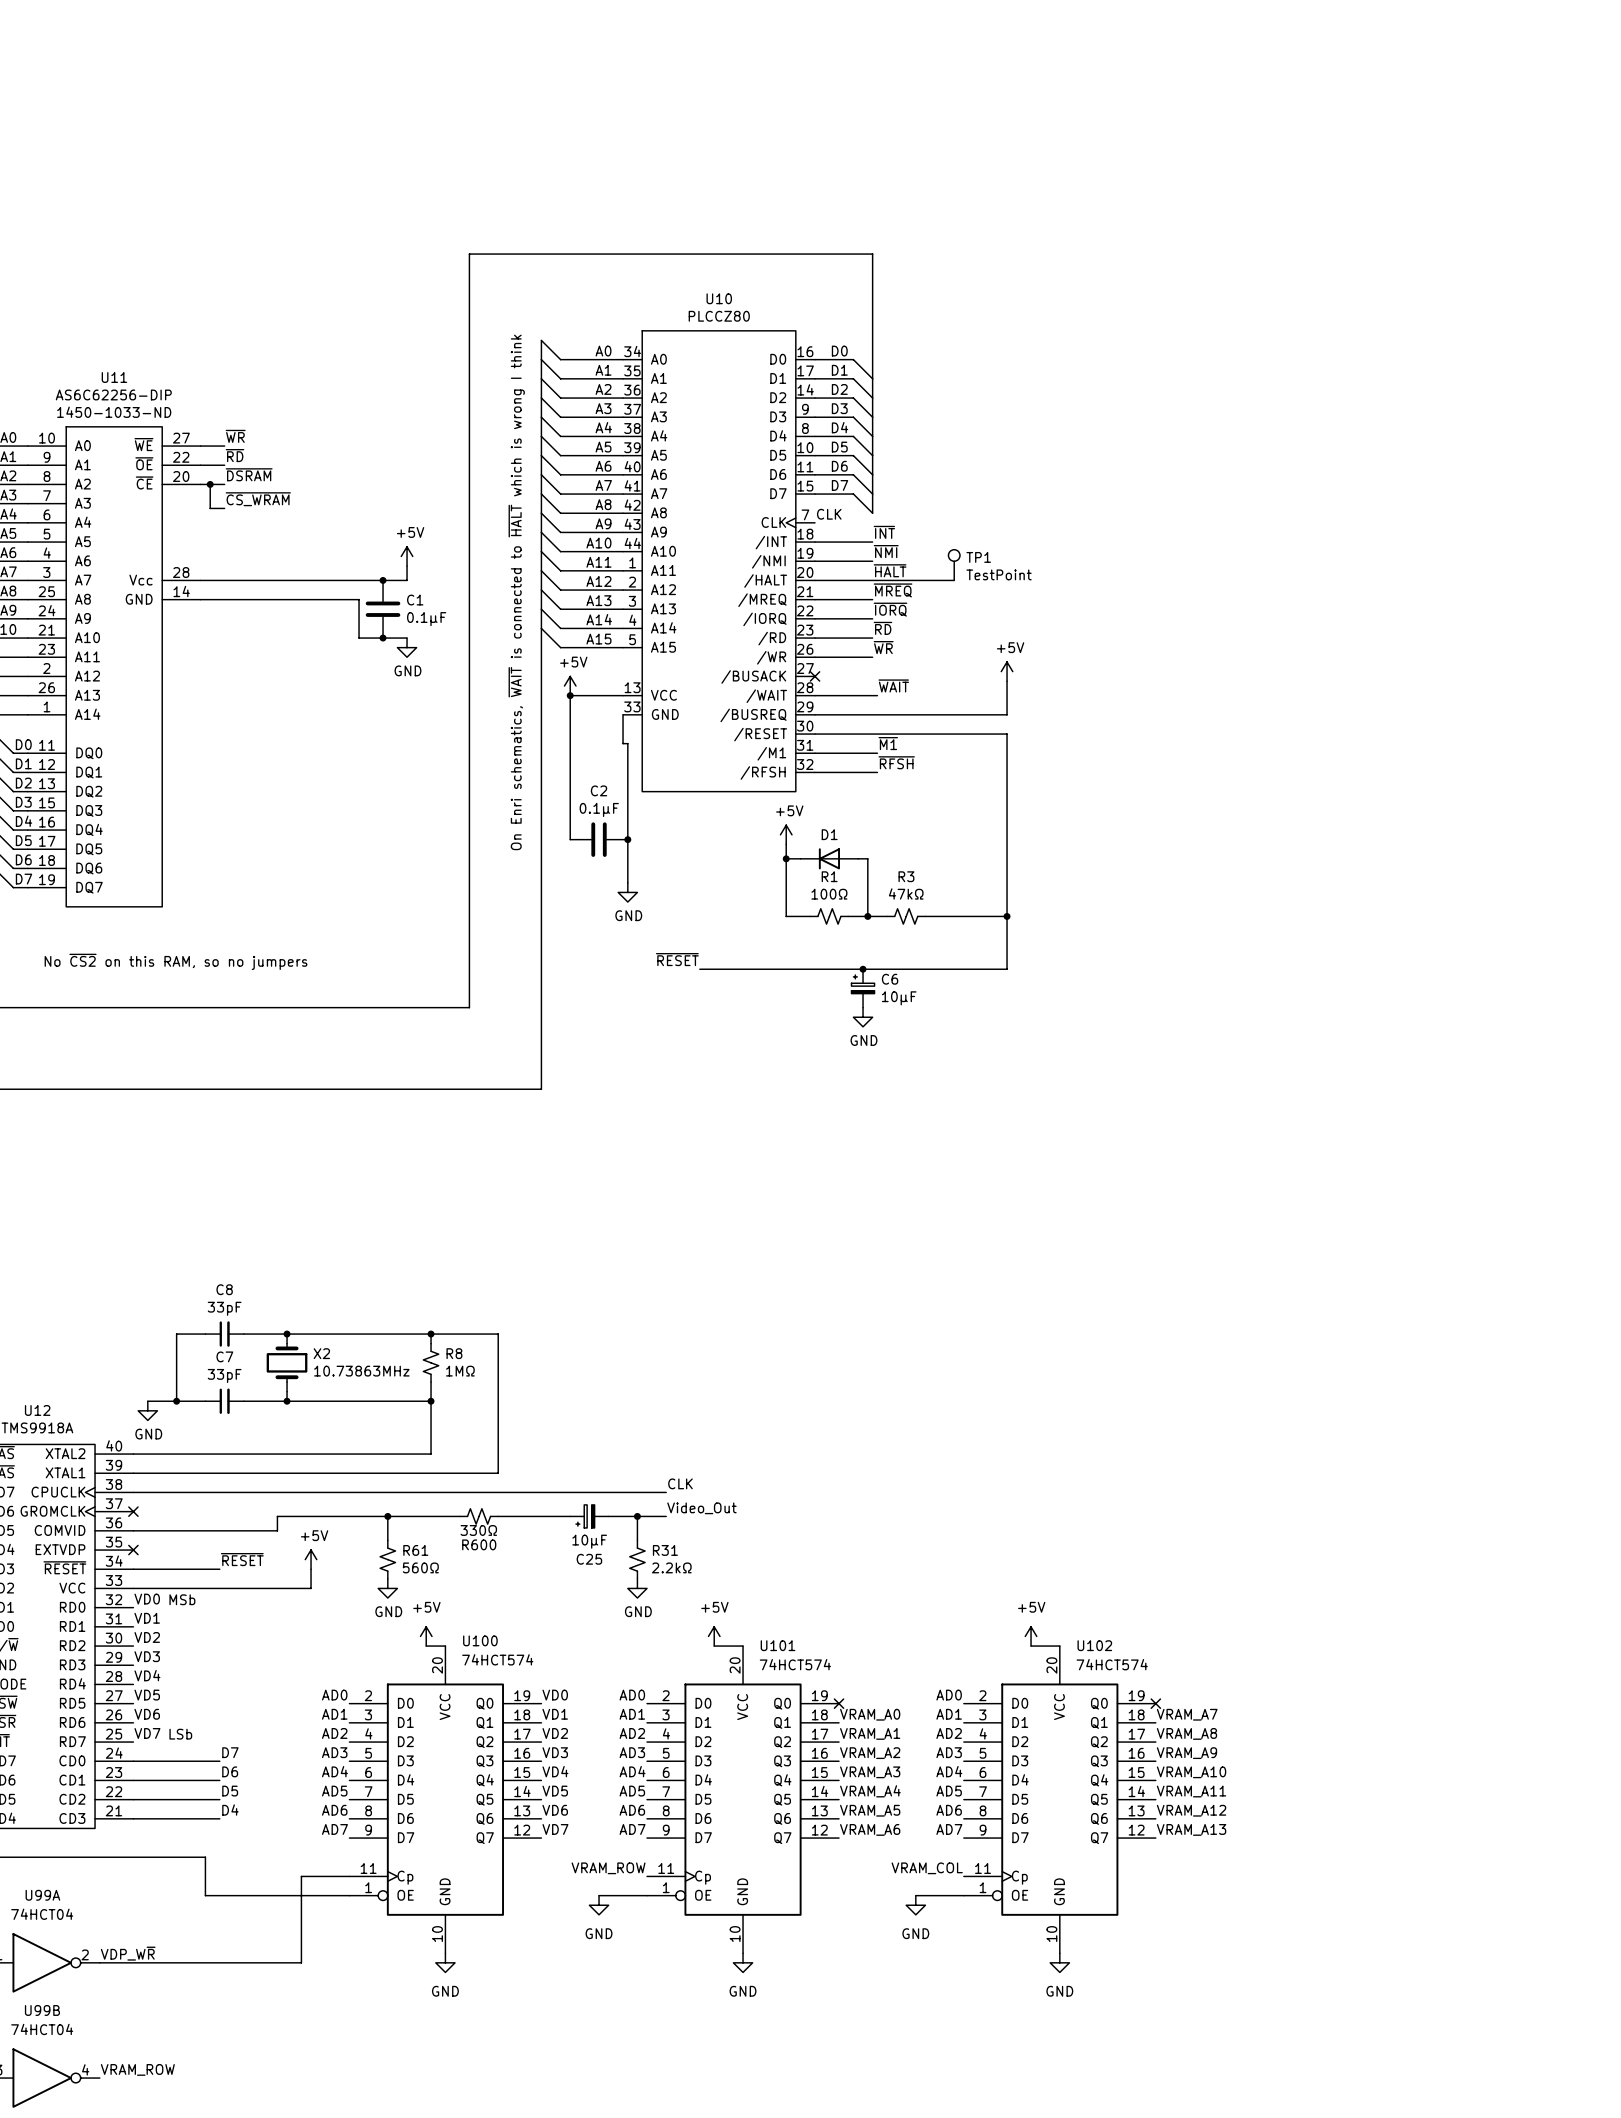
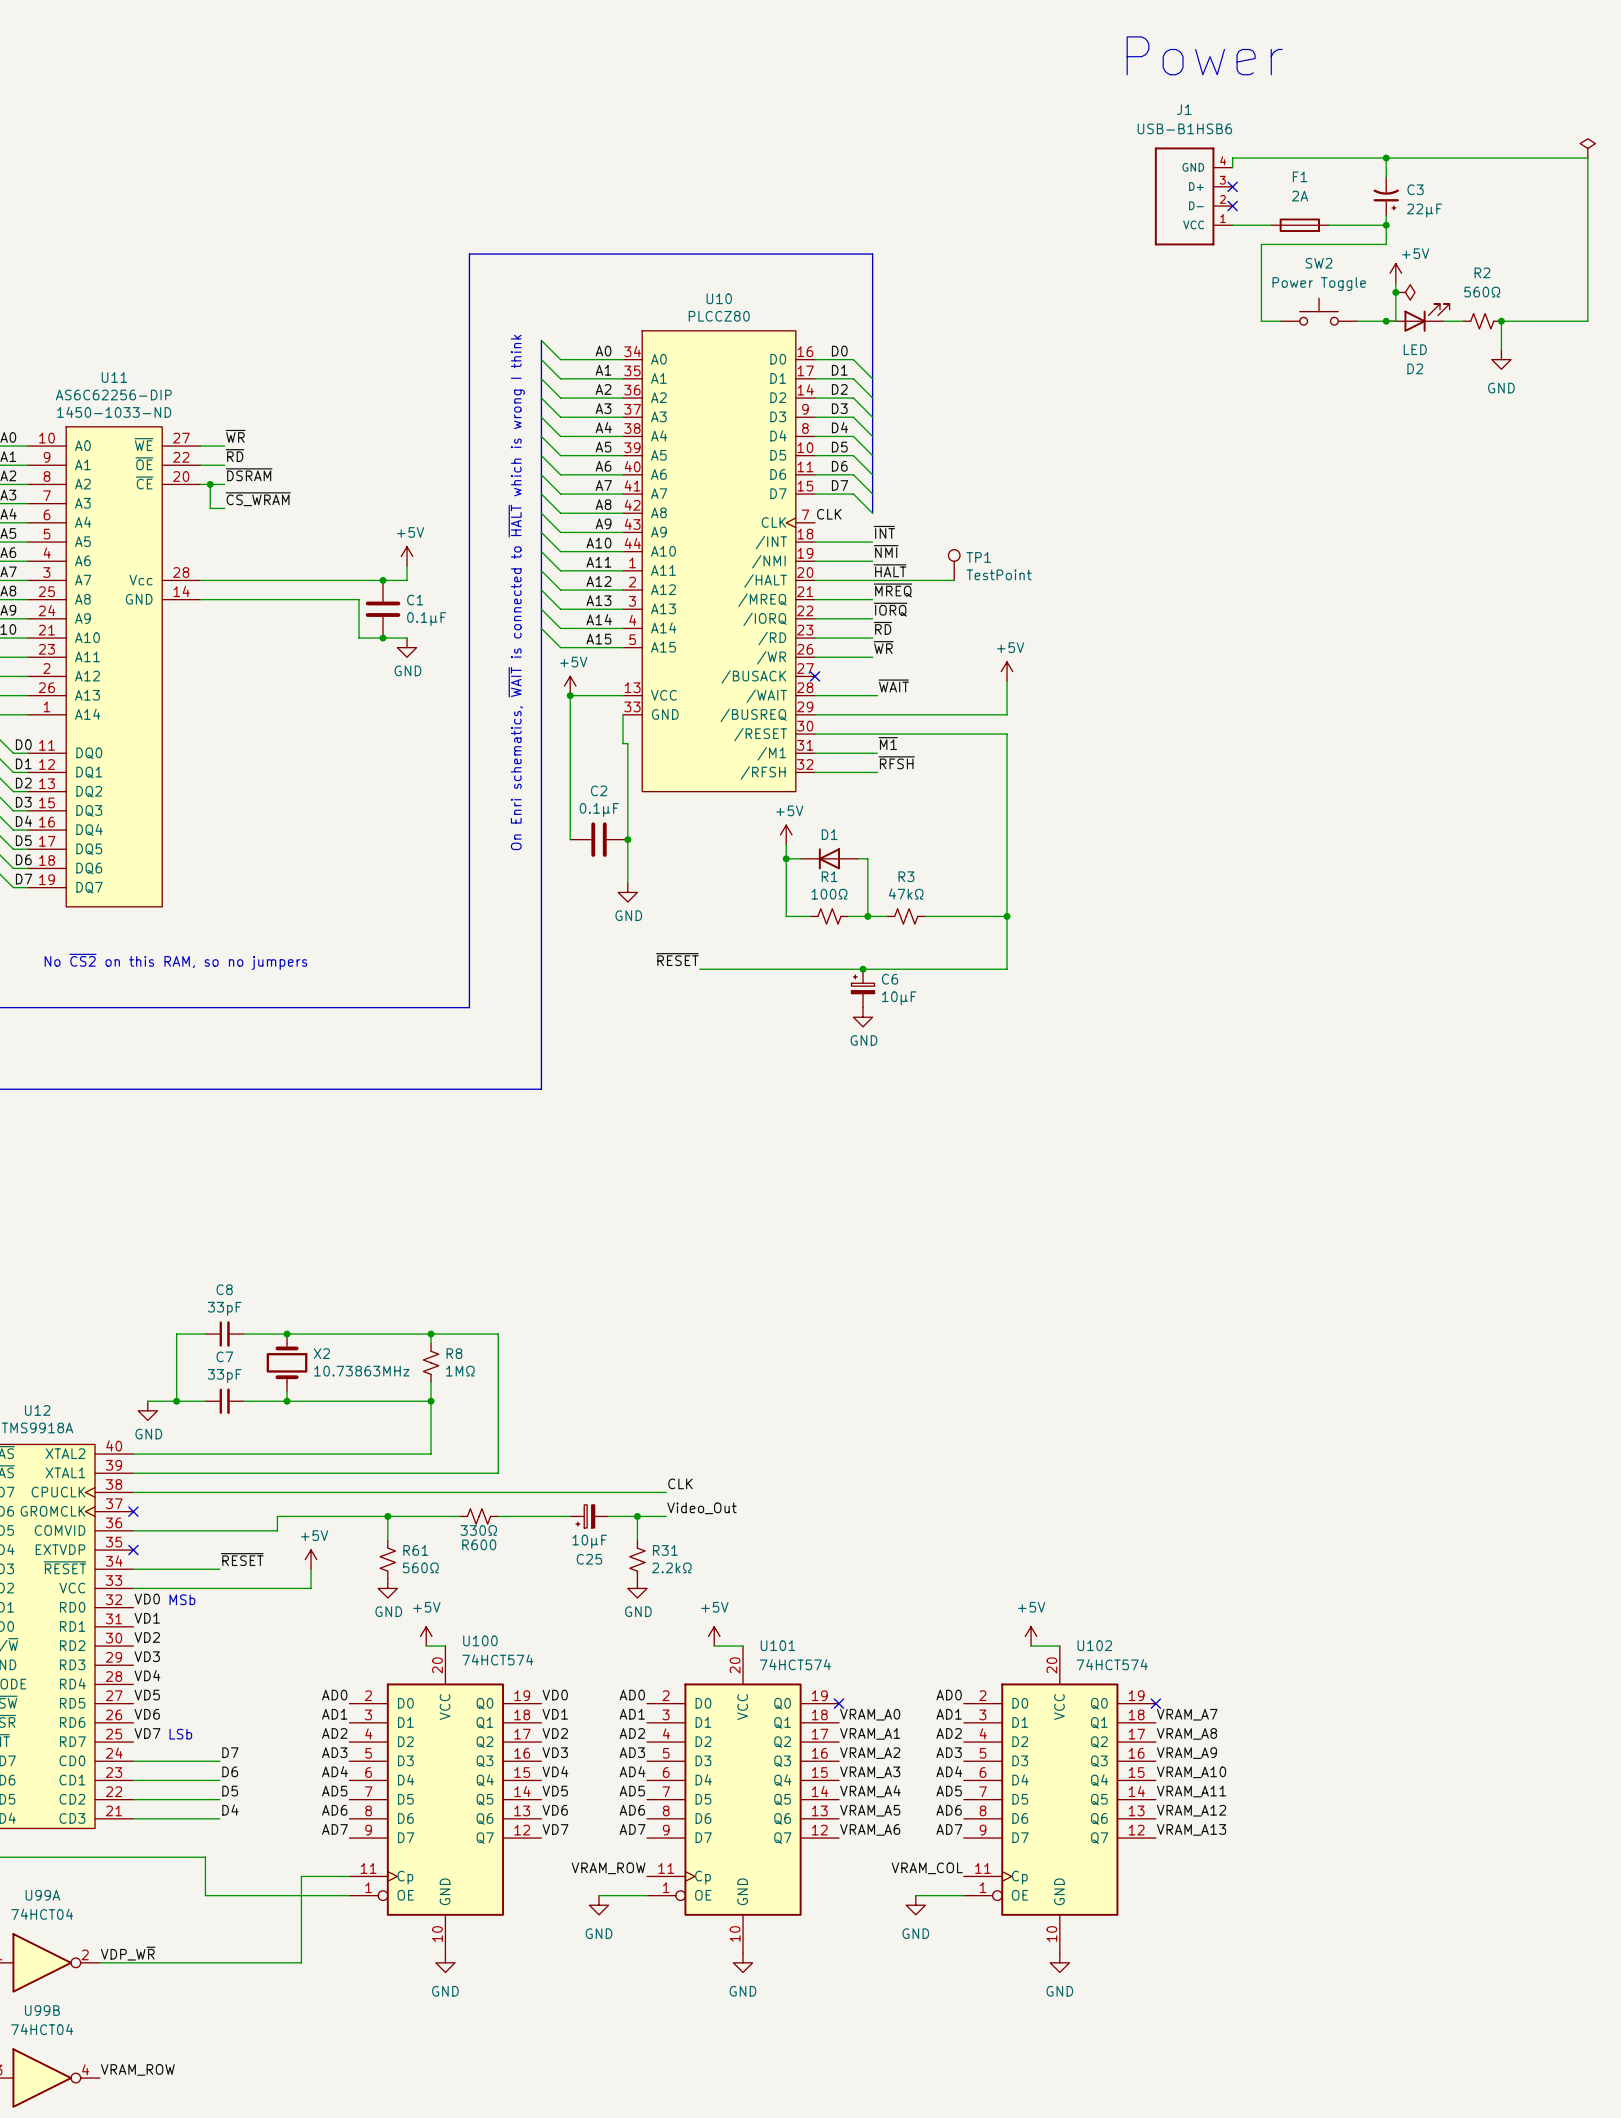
text: none -> Power (1204, 55)
power symbol: none -> (1587, 148)
wire: none -> (1386, 158) (1386, 177)
junction: none -> (1386, 158)
wire: none -> (1232, 167) (1232, 158) (1587, 158) (1587, 321) (1501, 321) (1501, 350)
no-connect mark: none -> (1232, 186)
J1: none -> USB-B1HSB6 (1193, 196)
C3: none -> 22µF (1386, 196)
no-connect mark: none -> (1232, 206)
wire: none -> (1386, 215) (1386, 244) (1261, 244) (1261, 321) (1280, 321)
wire: none -> (1232, 225) (1271, 225)
F1: none -> 2A (1299, 225)
wire: none -> (1328, 225) (1386, 225)
junction: none -> (1386, 225)
power symbol: none -> +5V (1395, 273)
wire: none -> (1395, 282) (1395, 321) (1357, 321)
junction: none -> (1395, 292)
power symbol: none -> (1405, 292)
SW2: none -> Power Toggle (1319, 311)
D2: none -> LED (1417, 317)
junction: none -> (1386, 321)
wire: none -> (1443, 321) (1463, 321)
R2: none -> 560Ω (1482, 321)
junction: none -> (1501, 321)
power symbol: none -> GND (1501, 359)

